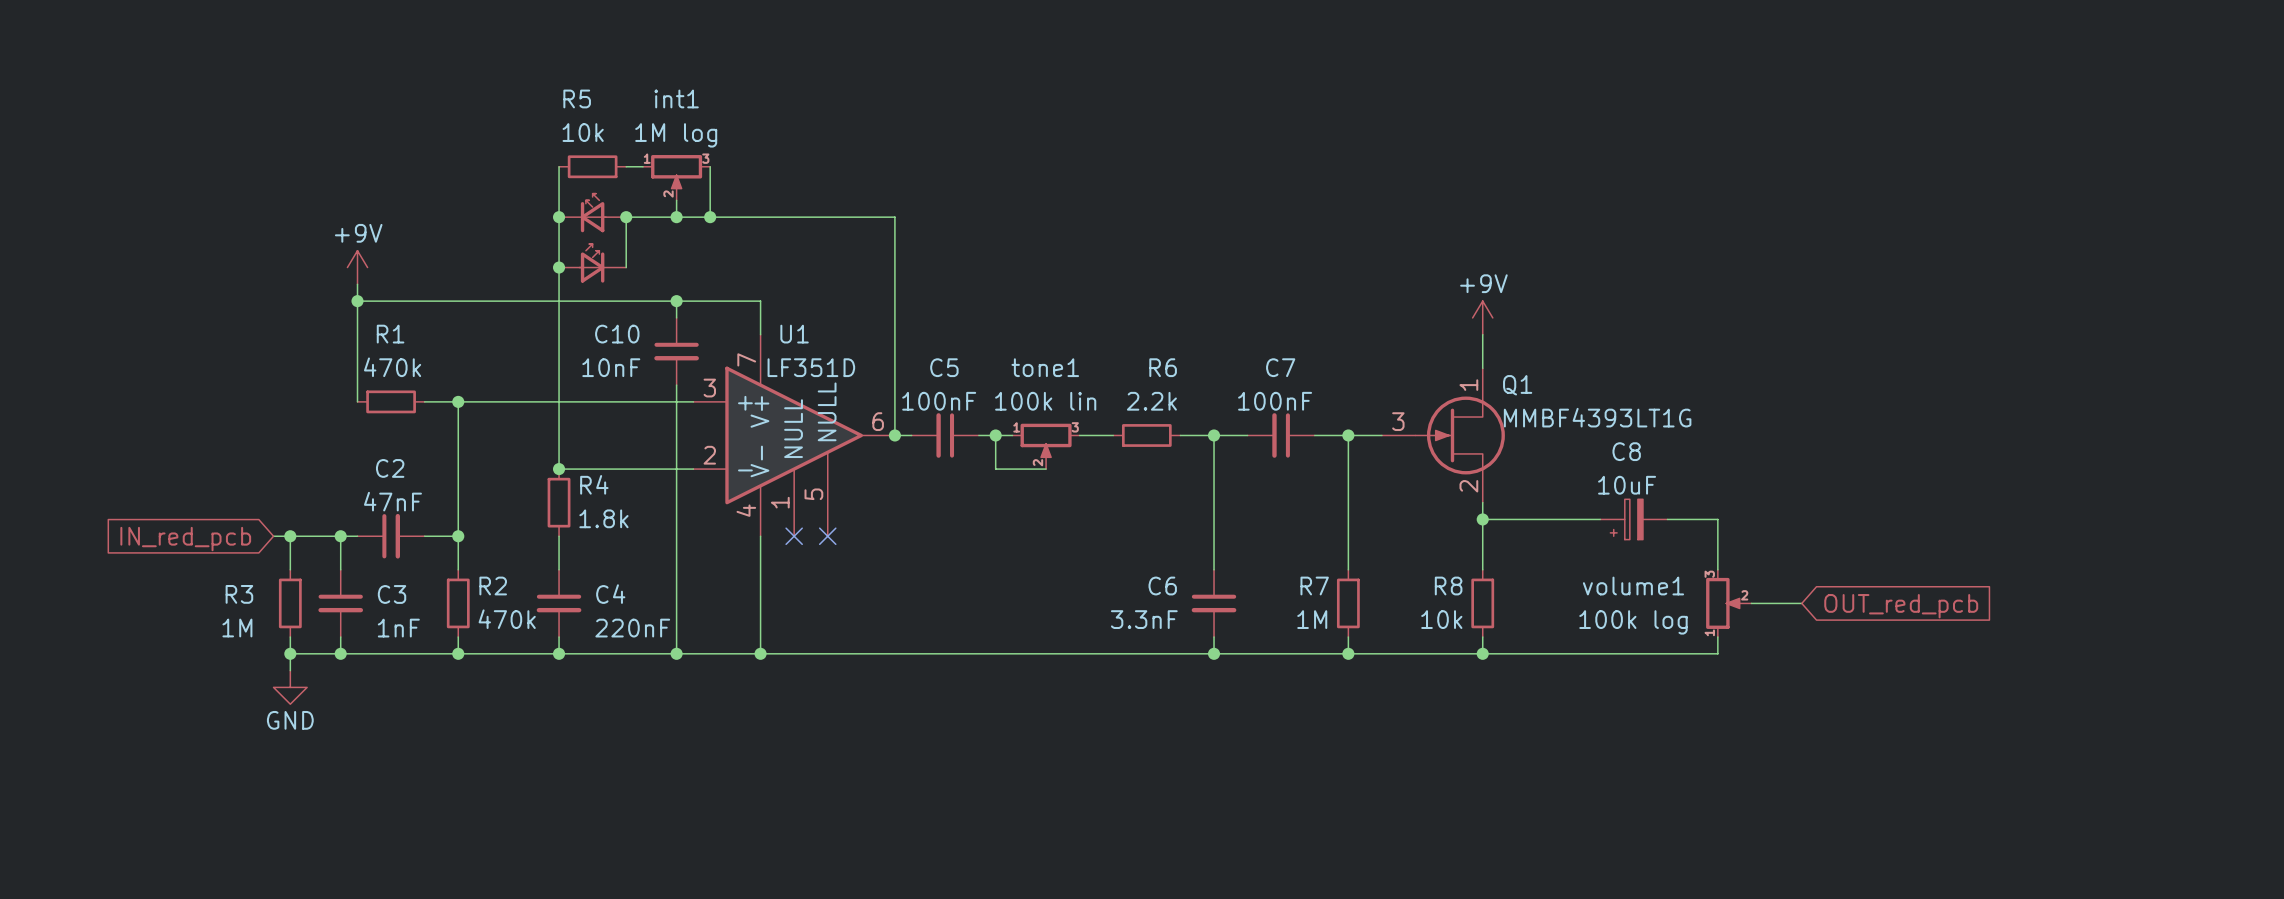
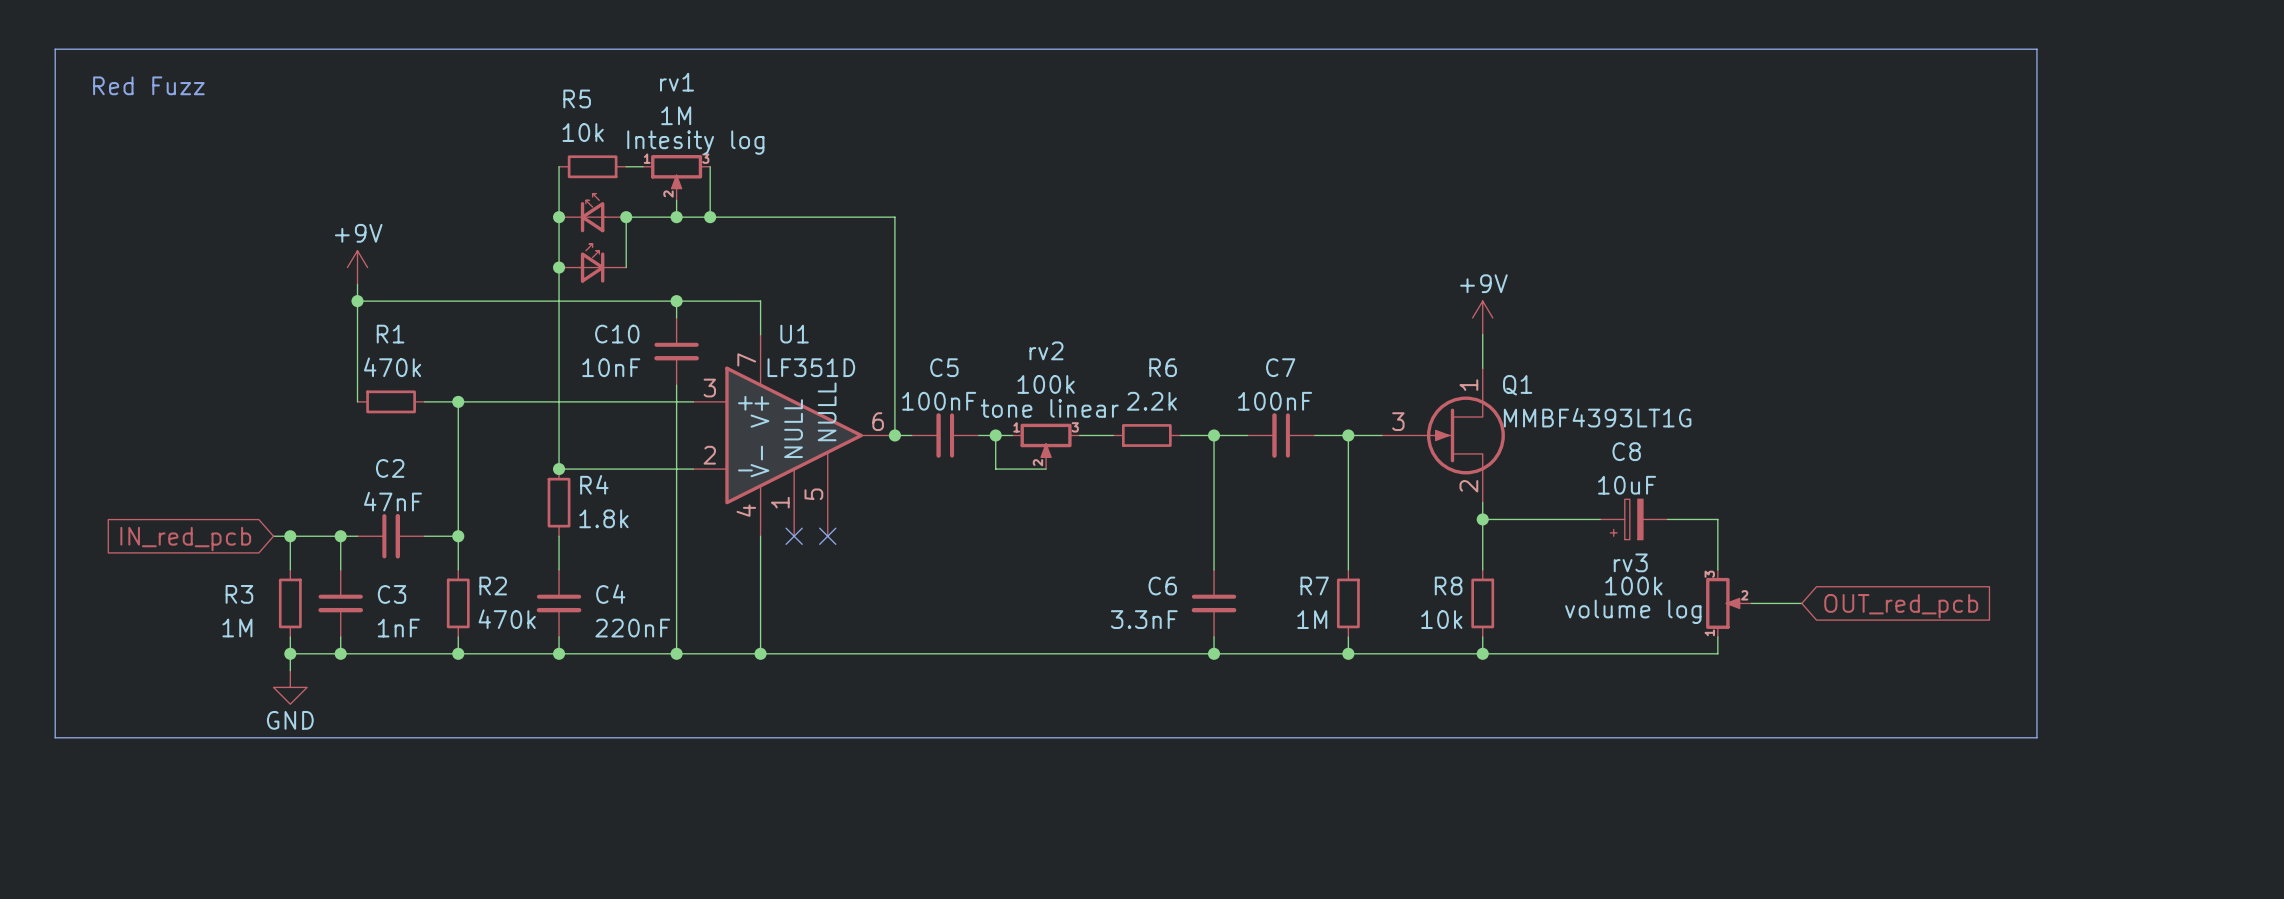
line: none -> (55, 49) (2036, 49) (2036, 737) (55, 737) (55, 49)
text: none -> Red Fuzz (148, 85)
int1 name: int1 (676, 98) -> rv1 (677, 82)
int1 value: 1M log (676, 135) -> 1M (676, 115)
int1 text: none -> Intesity log (695, 142)
tone1 name: tone1 (1045, 367) -> rv2 (1046, 350)
tone1 value: 100k lin (1045, 401) -> 100k (1046, 384)
tone1 text: none -> tone linear (1049, 408)
volume1 name: volume1 (1633, 586) -> rv3 (1630, 562)
volume1 text: none -> volume log (1633, 611)
volume1 value: 100k log (1633, 622) -> 100k (1633, 586)

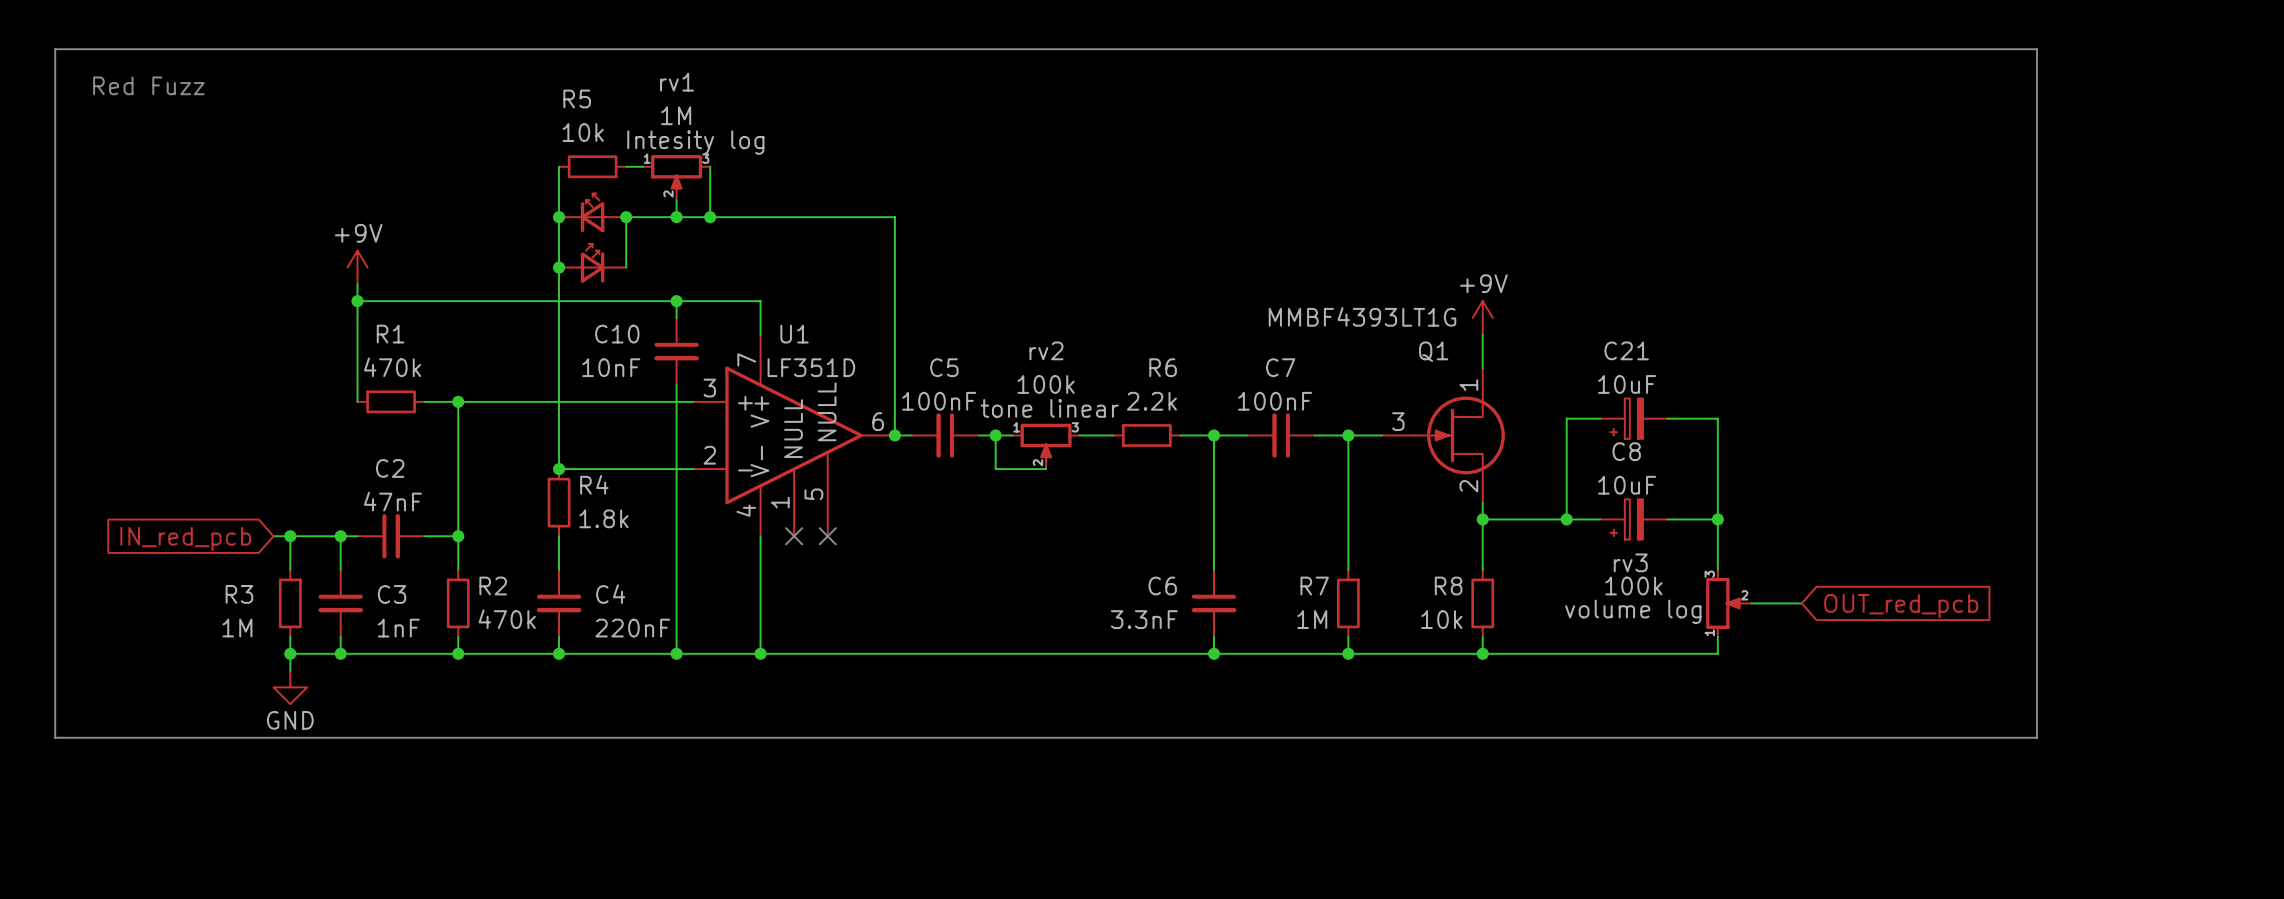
Q1 name position: Q1 (1517, 385) -> Q1 (1433, 351)
Q1 value position: MMBF4393LT1G (1597, 417) -> MMBF4393LT1G (1362, 316)
wire: none -> (1600, 418) (1566, 418) (1566, 519)
C21: none -> 10uF (1633, 418)
wire: none -> (1667, 418) (1717, 418) (1717, 519)
junction: none -> (1566, 519)
junction: none -> (1717, 519)

